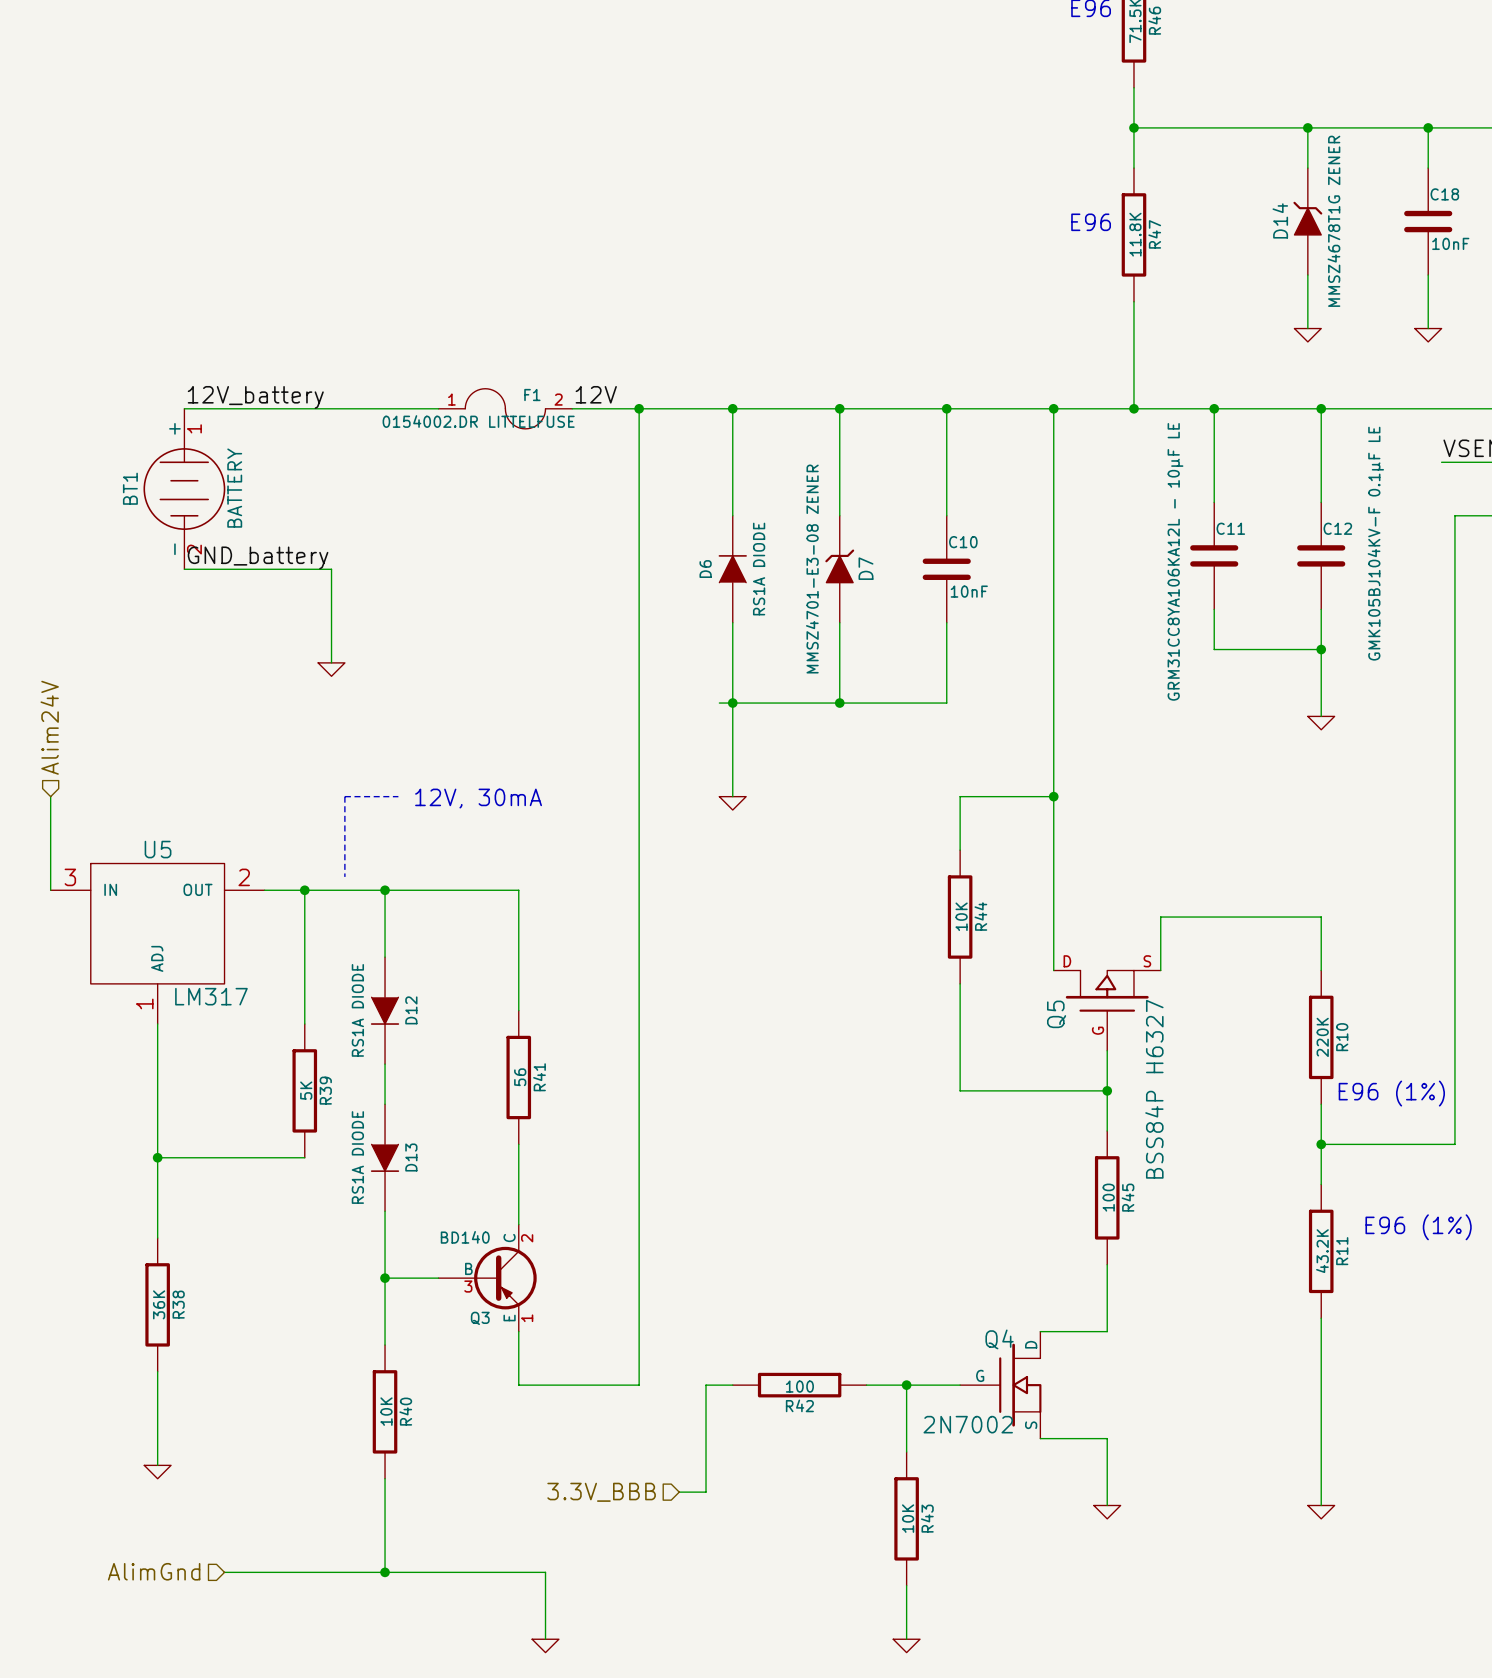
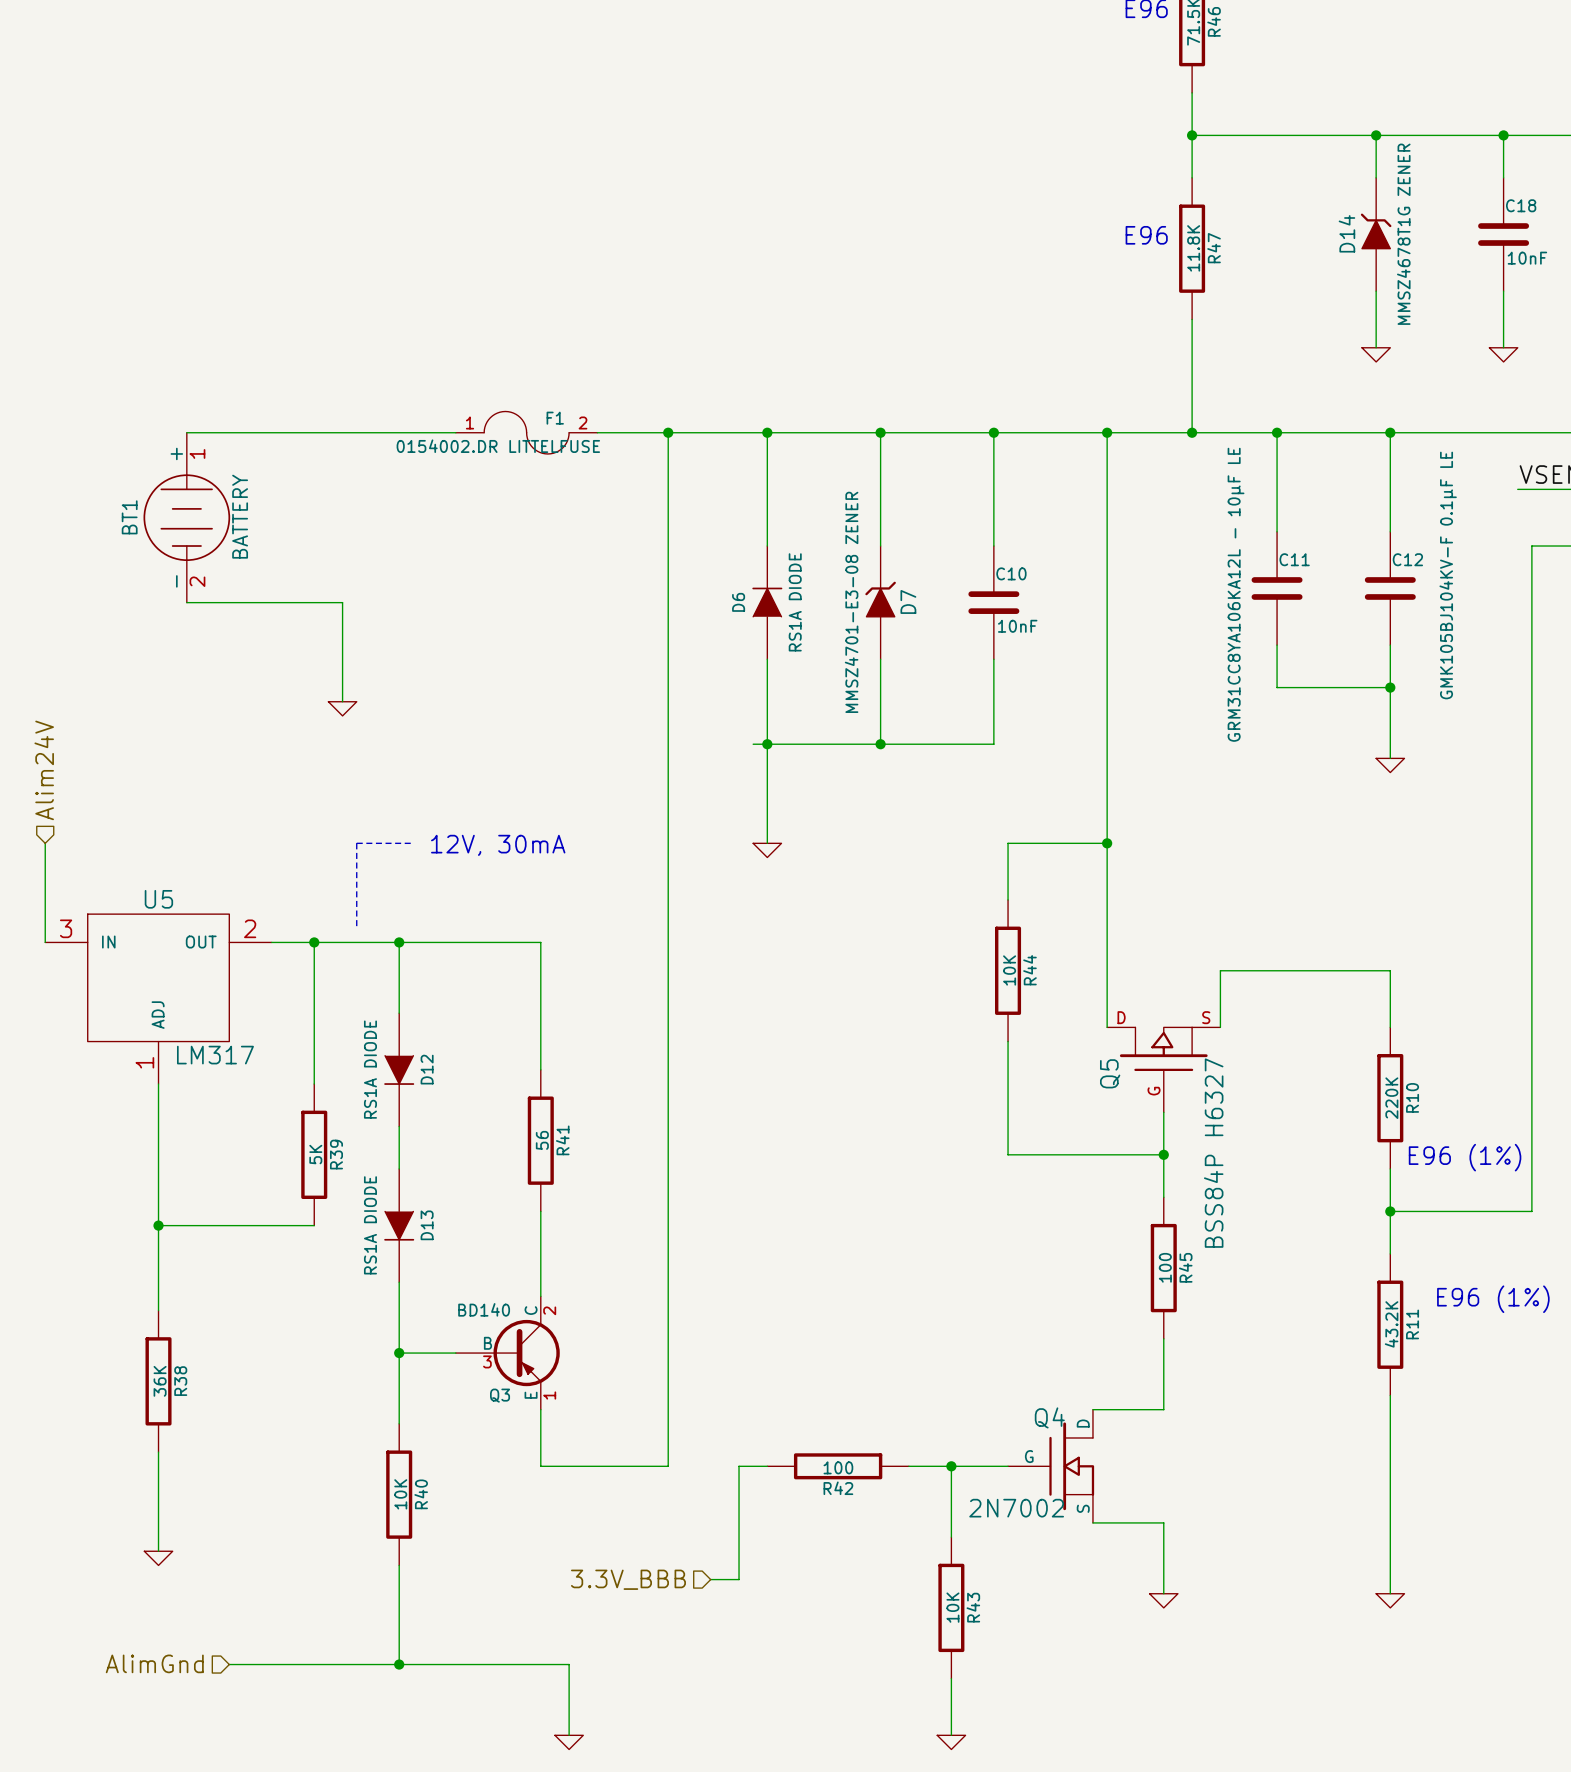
label: 12V (596, 394) -> none
label: 12V_battery (255, 397) -> none
label: GND_battery (258, 557) -> none

